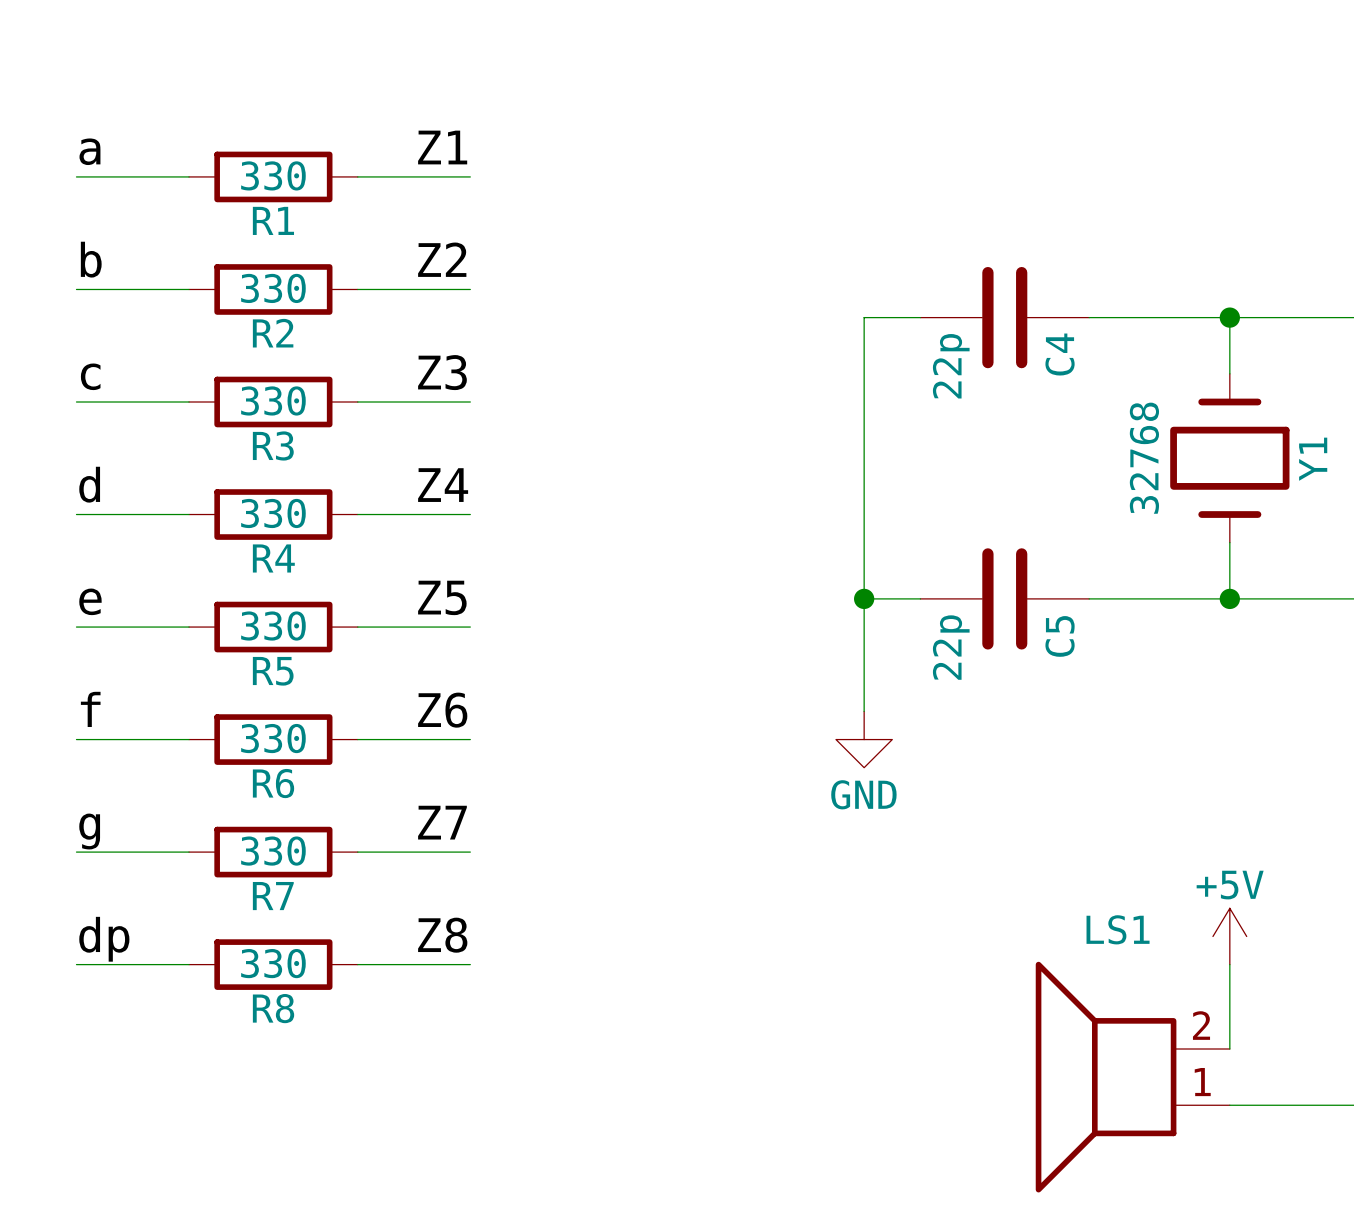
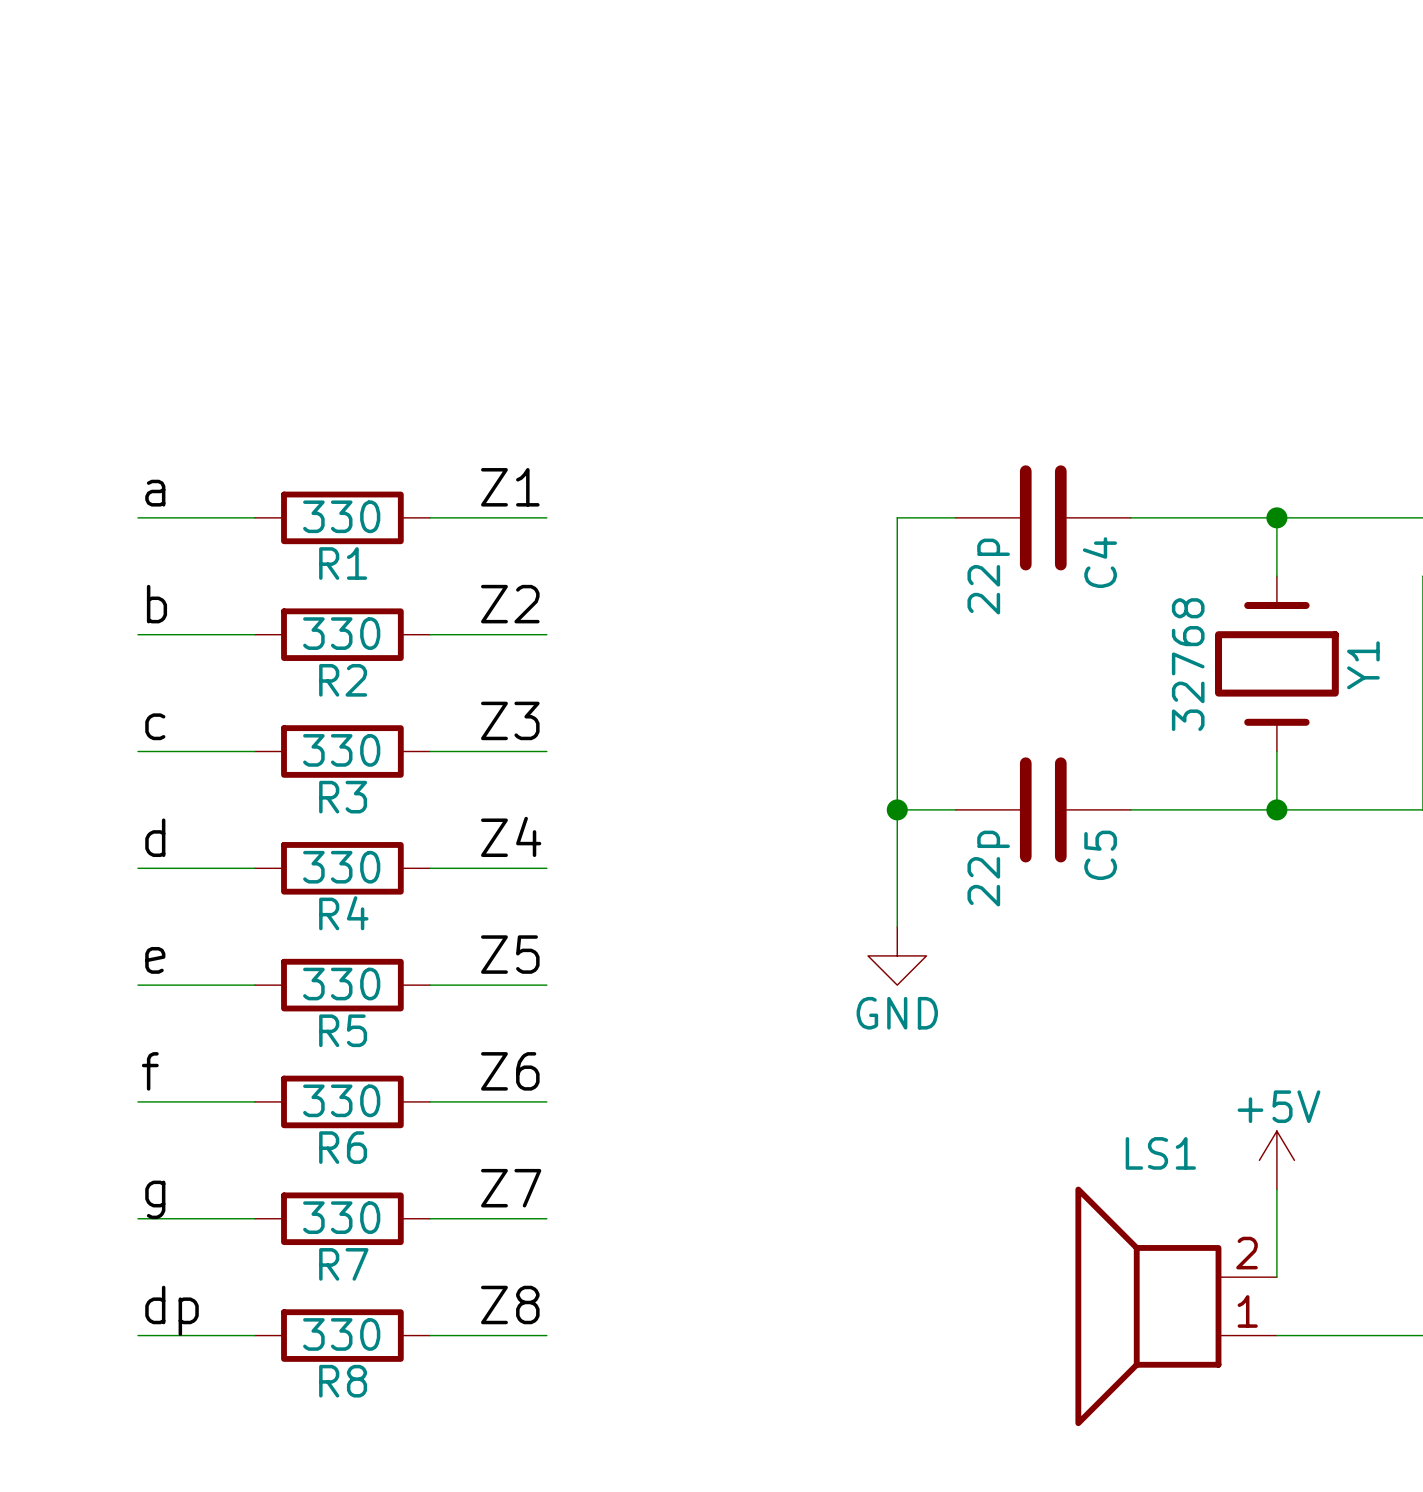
label position: Z1 (442, 147) -> Z1 (510, 487)
label position: a (89, 151) -> a (155, 493)
wire: (76, 176) (189, 176) -> (137, 517) (254, 517)
R1 position: (273, 176) -> (342, 517)
wire: (357, 176) (470, 176) -> (430, 517) (546, 517)
label position: b (91, 259) -> b (156, 604)
label position: Z2 (442, 259) -> Z2 (510, 604)
wire: (76, 289) (189, 289) -> (137, 634) (254, 634)
R2 position: (273, 289) -> (342, 634)
wire: (357, 289) (470, 289) -> (430, 634) (546, 634)
label position: Z3 (442, 372) -> Z3 (510, 720)
label position: c (90, 376) -> c (155, 726)
wire: (76, 402) (189, 402) -> (137, 751) (254, 751)
R3 position: (273, 402) -> (342, 751)
wire: (357, 402) (470, 402) -> (430, 751) (546, 751)
label position: d (89, 484) -> d (155, 837)
label position: Z4 (443, 485) -> Z4 (511, 836)
wire: (76, 514) (189, 514) -> (137, 868) (254, 868)
R4 position: (273, 514) -> (342, 868)
wire: (357, 514) (470, 514) -> (430, 868) (546, 868)
label position: Z5 (442, 597) -> Z5 (510, 954)
label position: e (90, 601) -> e (155, 960)
wire: (76, 627) (189, 627) -> (137, 985) (254, 985)
R5 position: (273, 627) -> (342, 985)
wire: (357, 627) (470, 627) -> (430, 985) (546, 985)
label position: f (90, 709) -> f (150, 1071)
label position: Z6 (442, 710) -> Z6 (510, 1071)
wire: (76, 739) (189, 739) -> (137, 1101) (254, 1101)
R6 position: (273, 739) -> (342, 1101)
wire: (357, 739) (470, 739) -> (430, 1101) (546, 1101)
label position: Z7 (442, 822) -> Z7 (511, 1188)
label position: g (89, 831) -> g (155, 1199)
wire: (76, 852) (189, 852) -> (137, 1218) (254, 1218)
R7 position: (273, 852) -> (342, 1218)
wire: (357, 852) (470, 852) -> (430, 1218) (546, 1218)
label position: Z8 (442, 935) -> Z8 (510, 1304)
label position: dp (104, 939) -> dp (172, 1310)
wire: (76, 964) (189, 964) -> (137, 1335) (254, 1335)
R8 position: (273, 964) -> (342, 1335)
wire: (357, 964) (470, 964) -> (430, 1335) (546, 1335)

